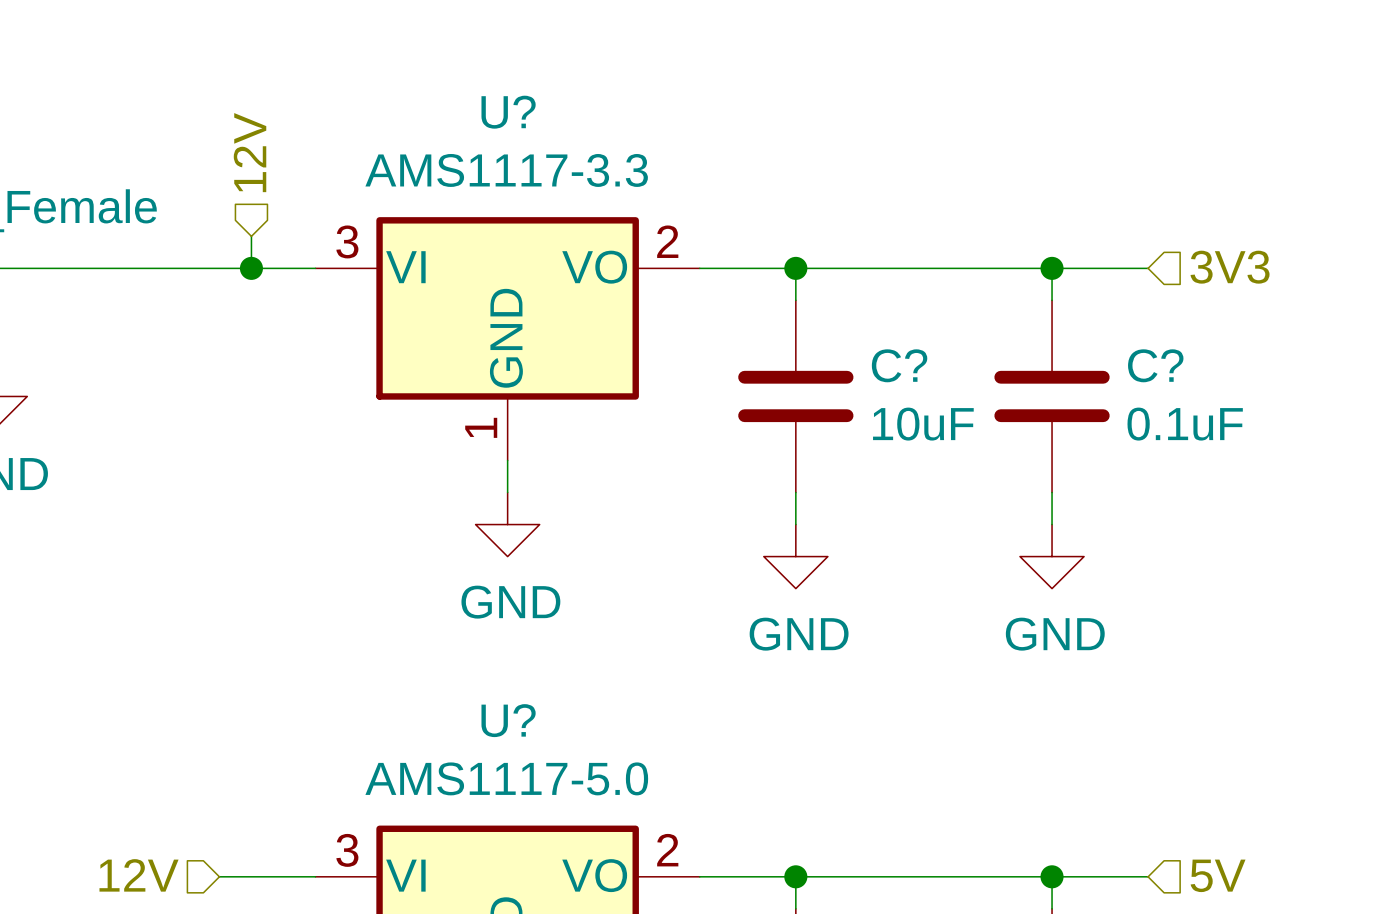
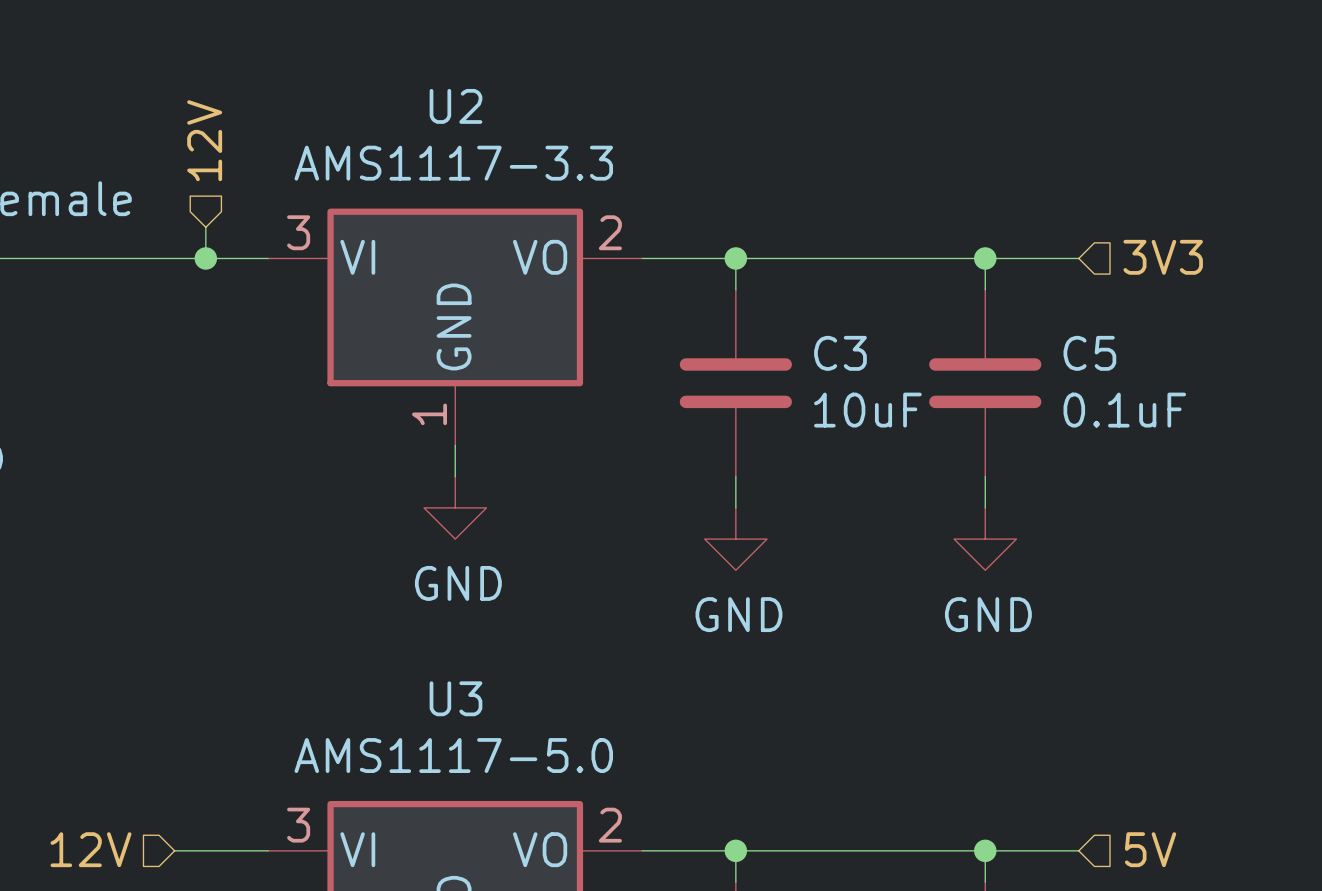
U? name: U? (508, 112) -> U2 (455, 106)
C? name: C? (899, 365) -> C3 (840, 353)
C? name: C? (1155, 365) -> C5 (1089, 353)
U? name: U? (508, 720) -> U3 (455, 698)

